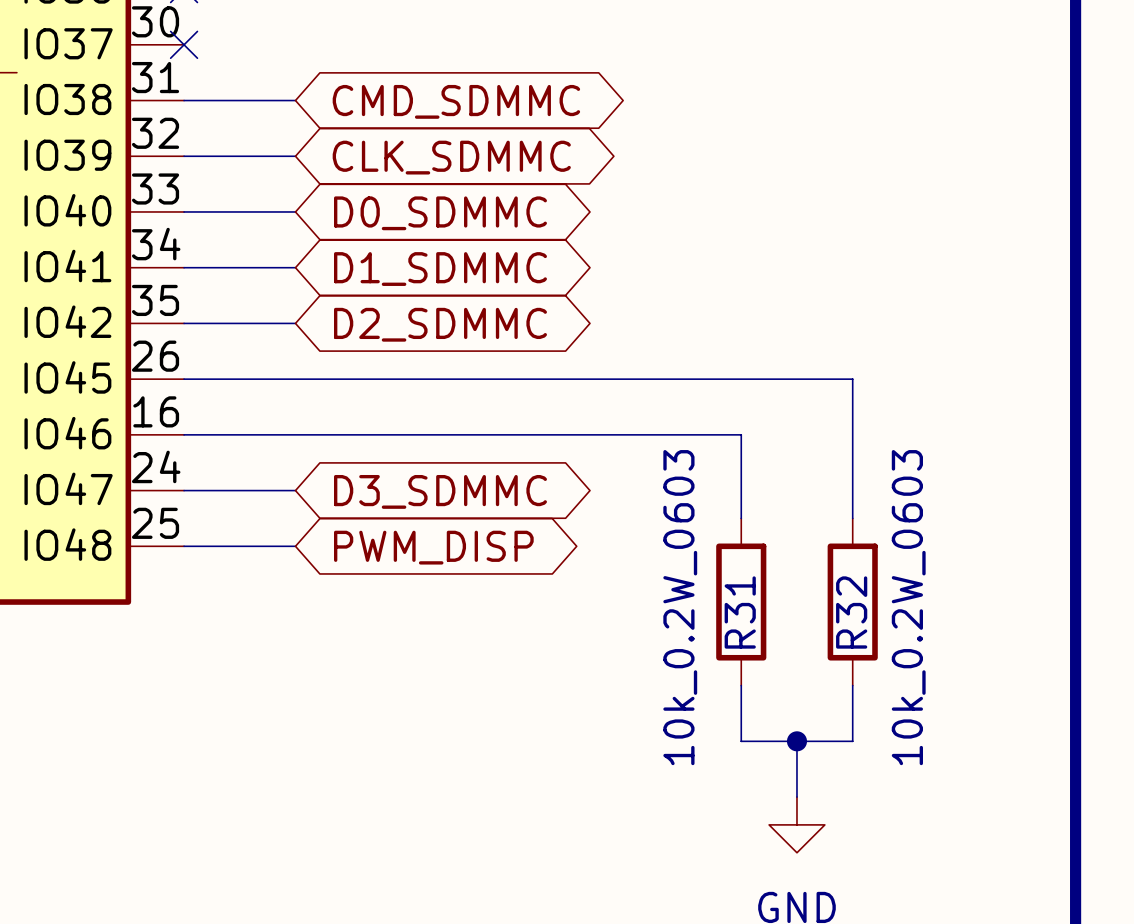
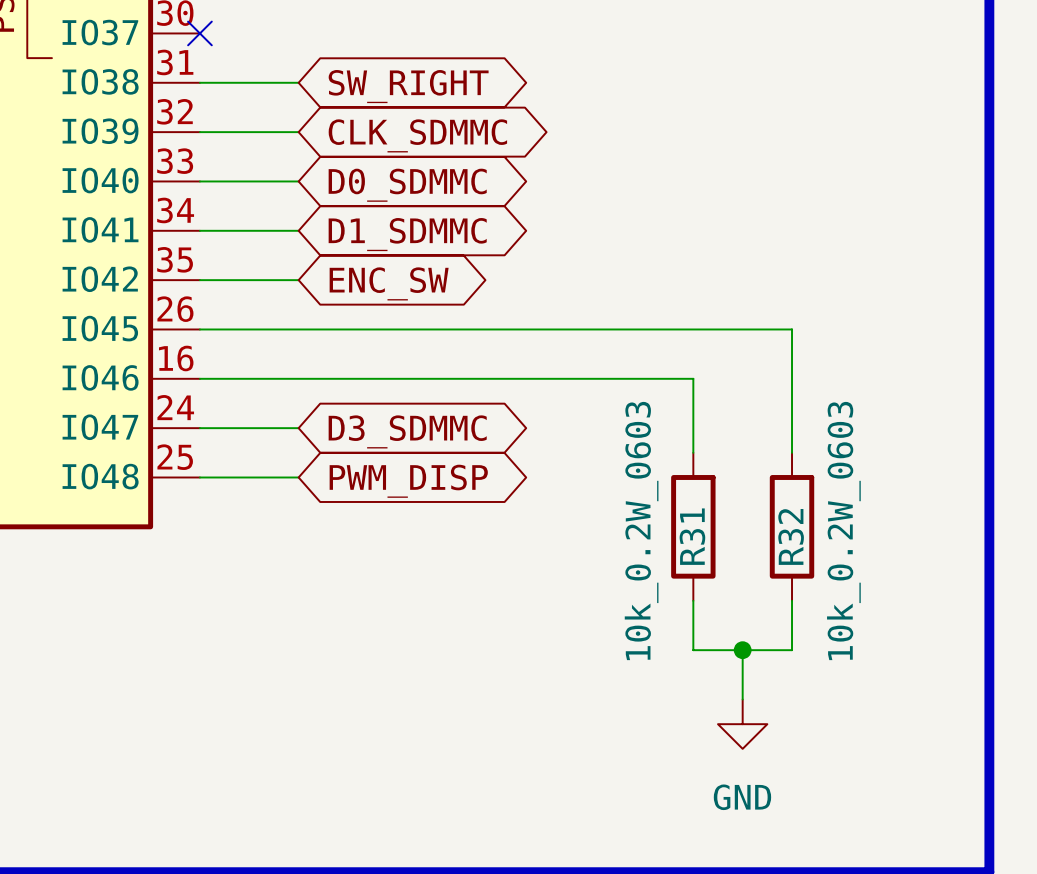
global label: CMD_SDMMC (456, 101) -> SW_RIGHT (408, 86)
global label: D2_SDMMC (440, 324) -> ENC_SW (389, 283)

